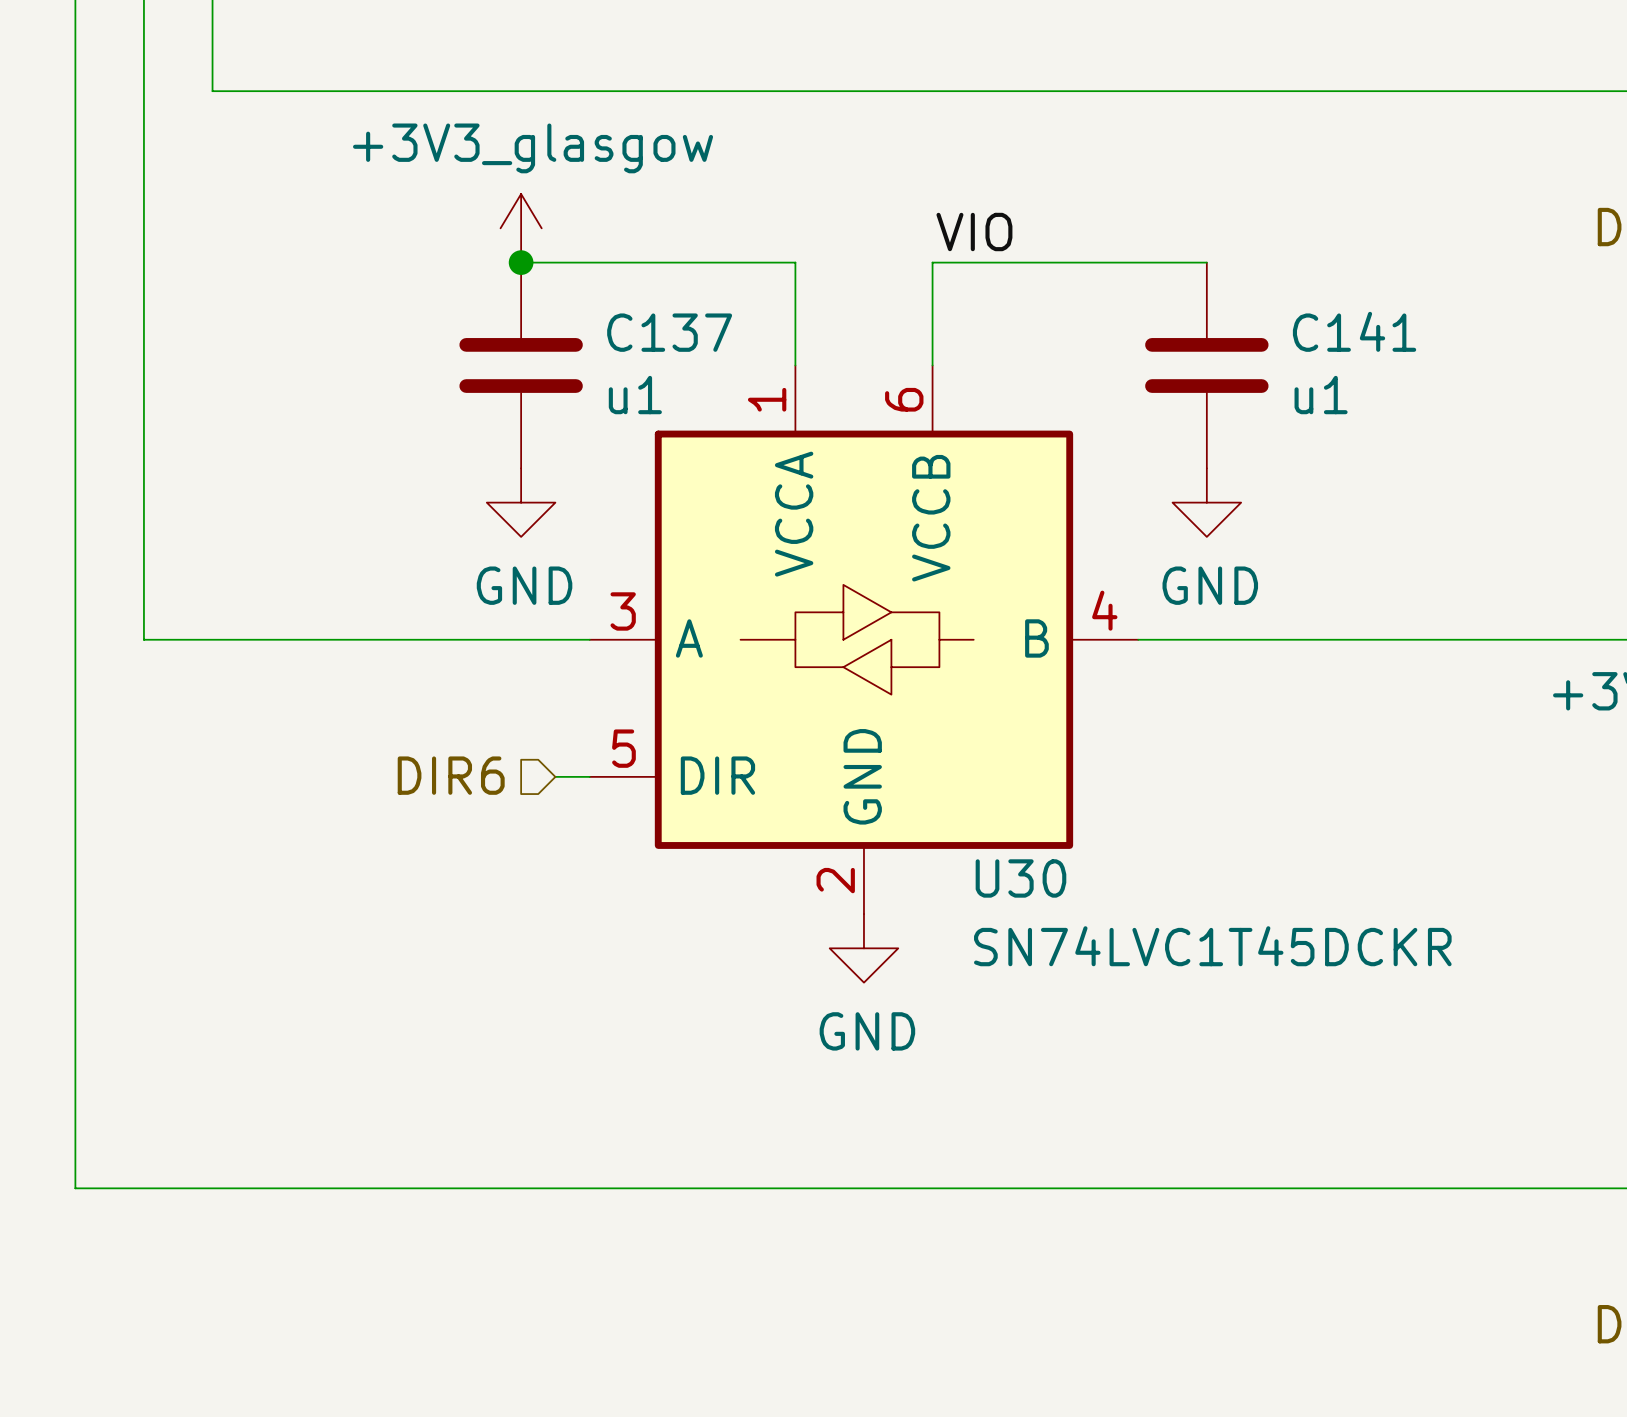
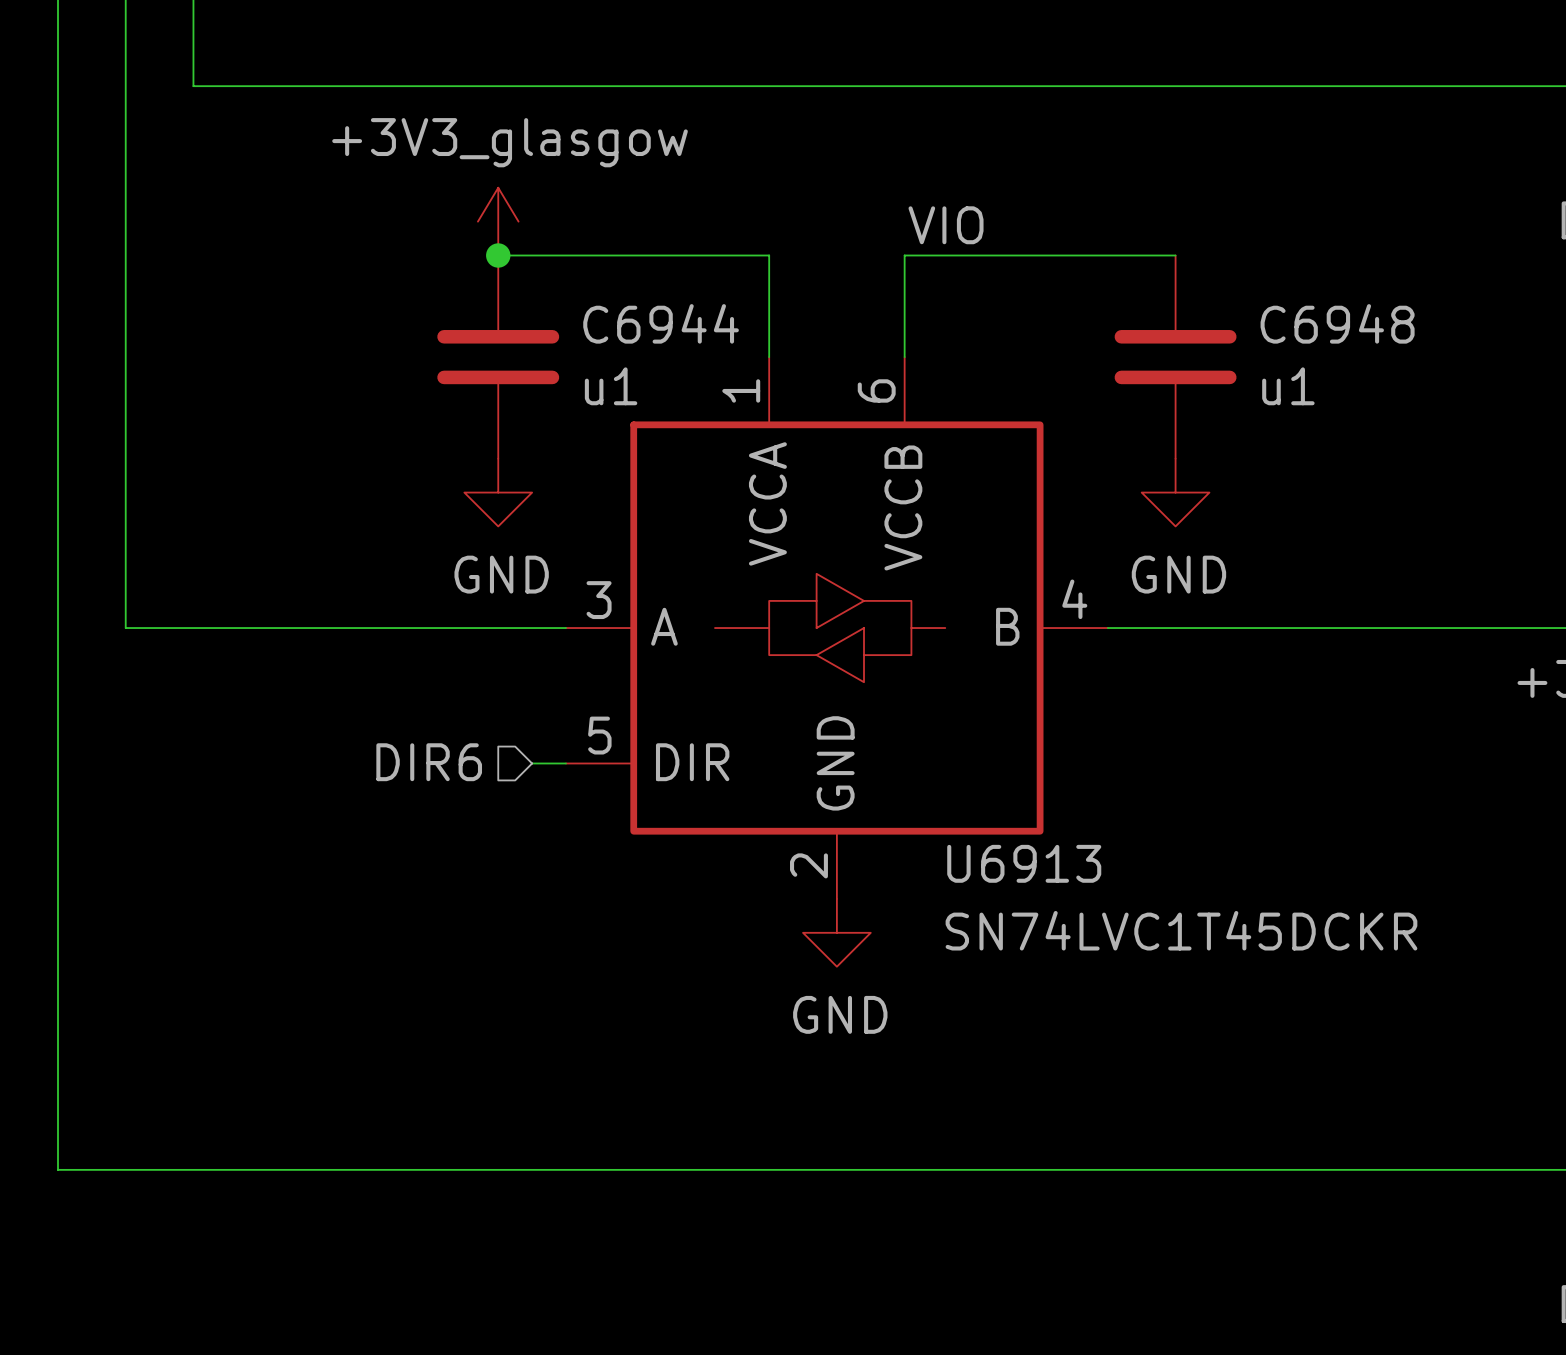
C141 name: C141 (1354, 331) -> C6948 (1337, 323)
C137 name: C137 (669, 332) -> C6944 (661, 323)
U30 name: U30 (1020, 878) -> U6913 (1024, 863)

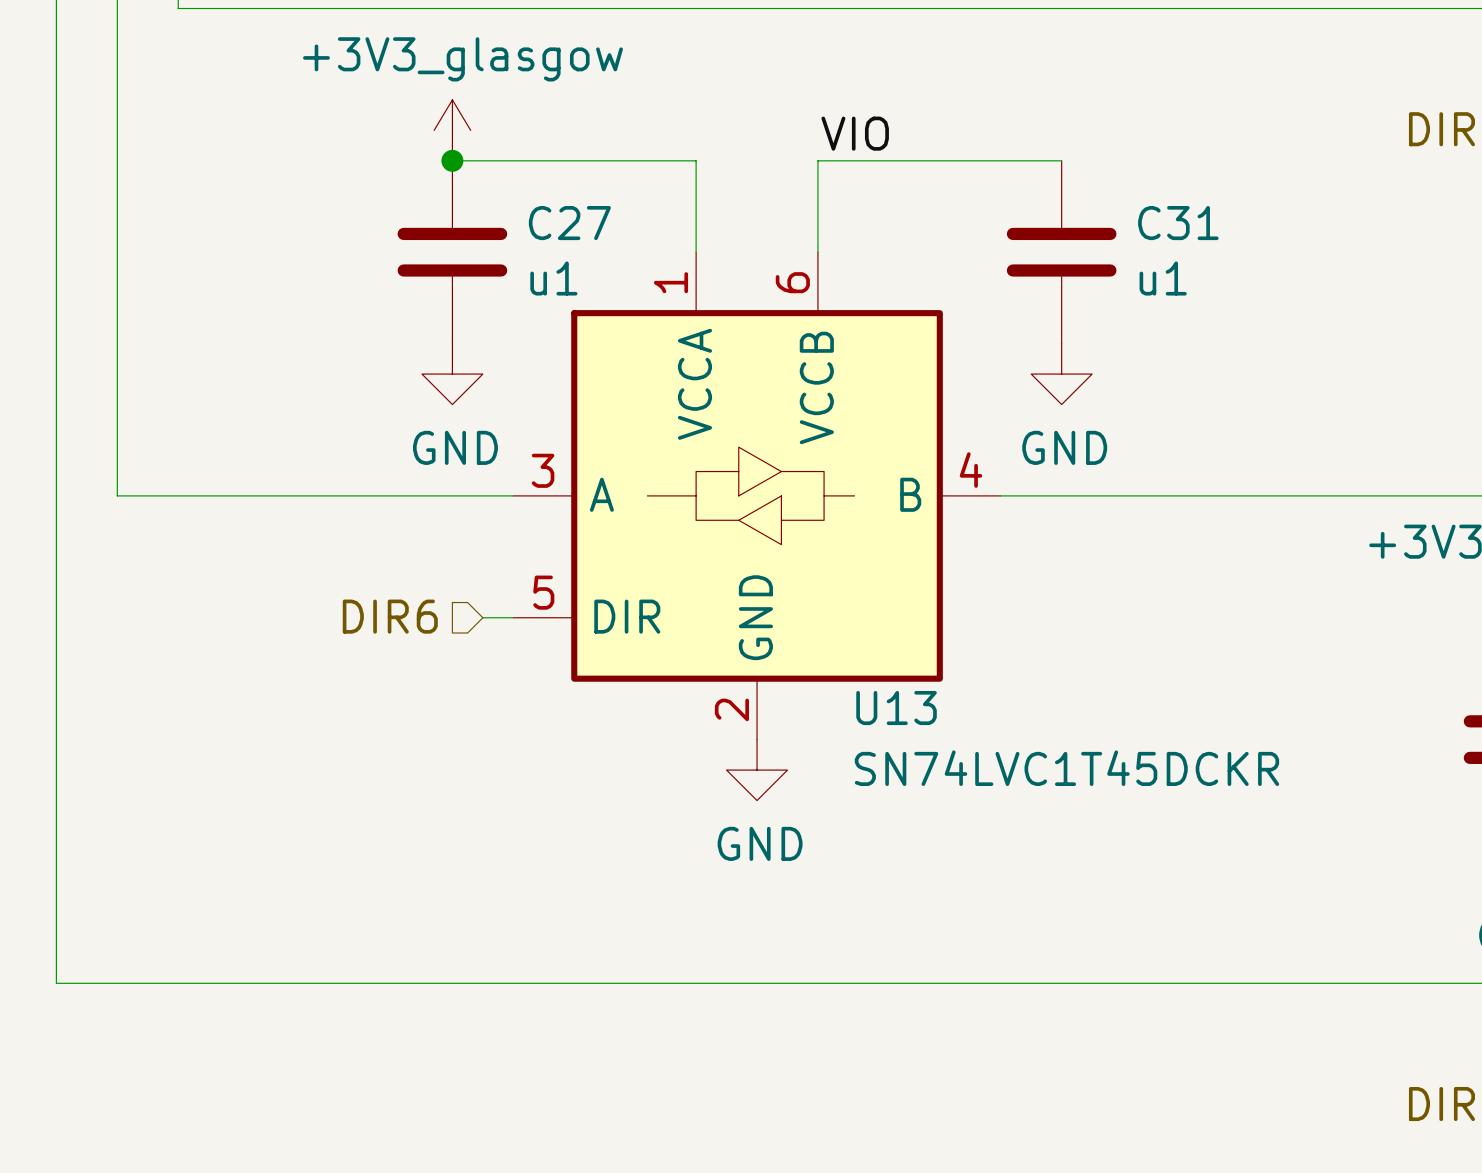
C6944 name: C6944 (661, 323) -> C27 (569, 223)
C6948 name: C6948 (1337, 323) -> C31 (1178, 223)
U6913 name: U6913 (1024, 863) -> U13 (896, 708)

